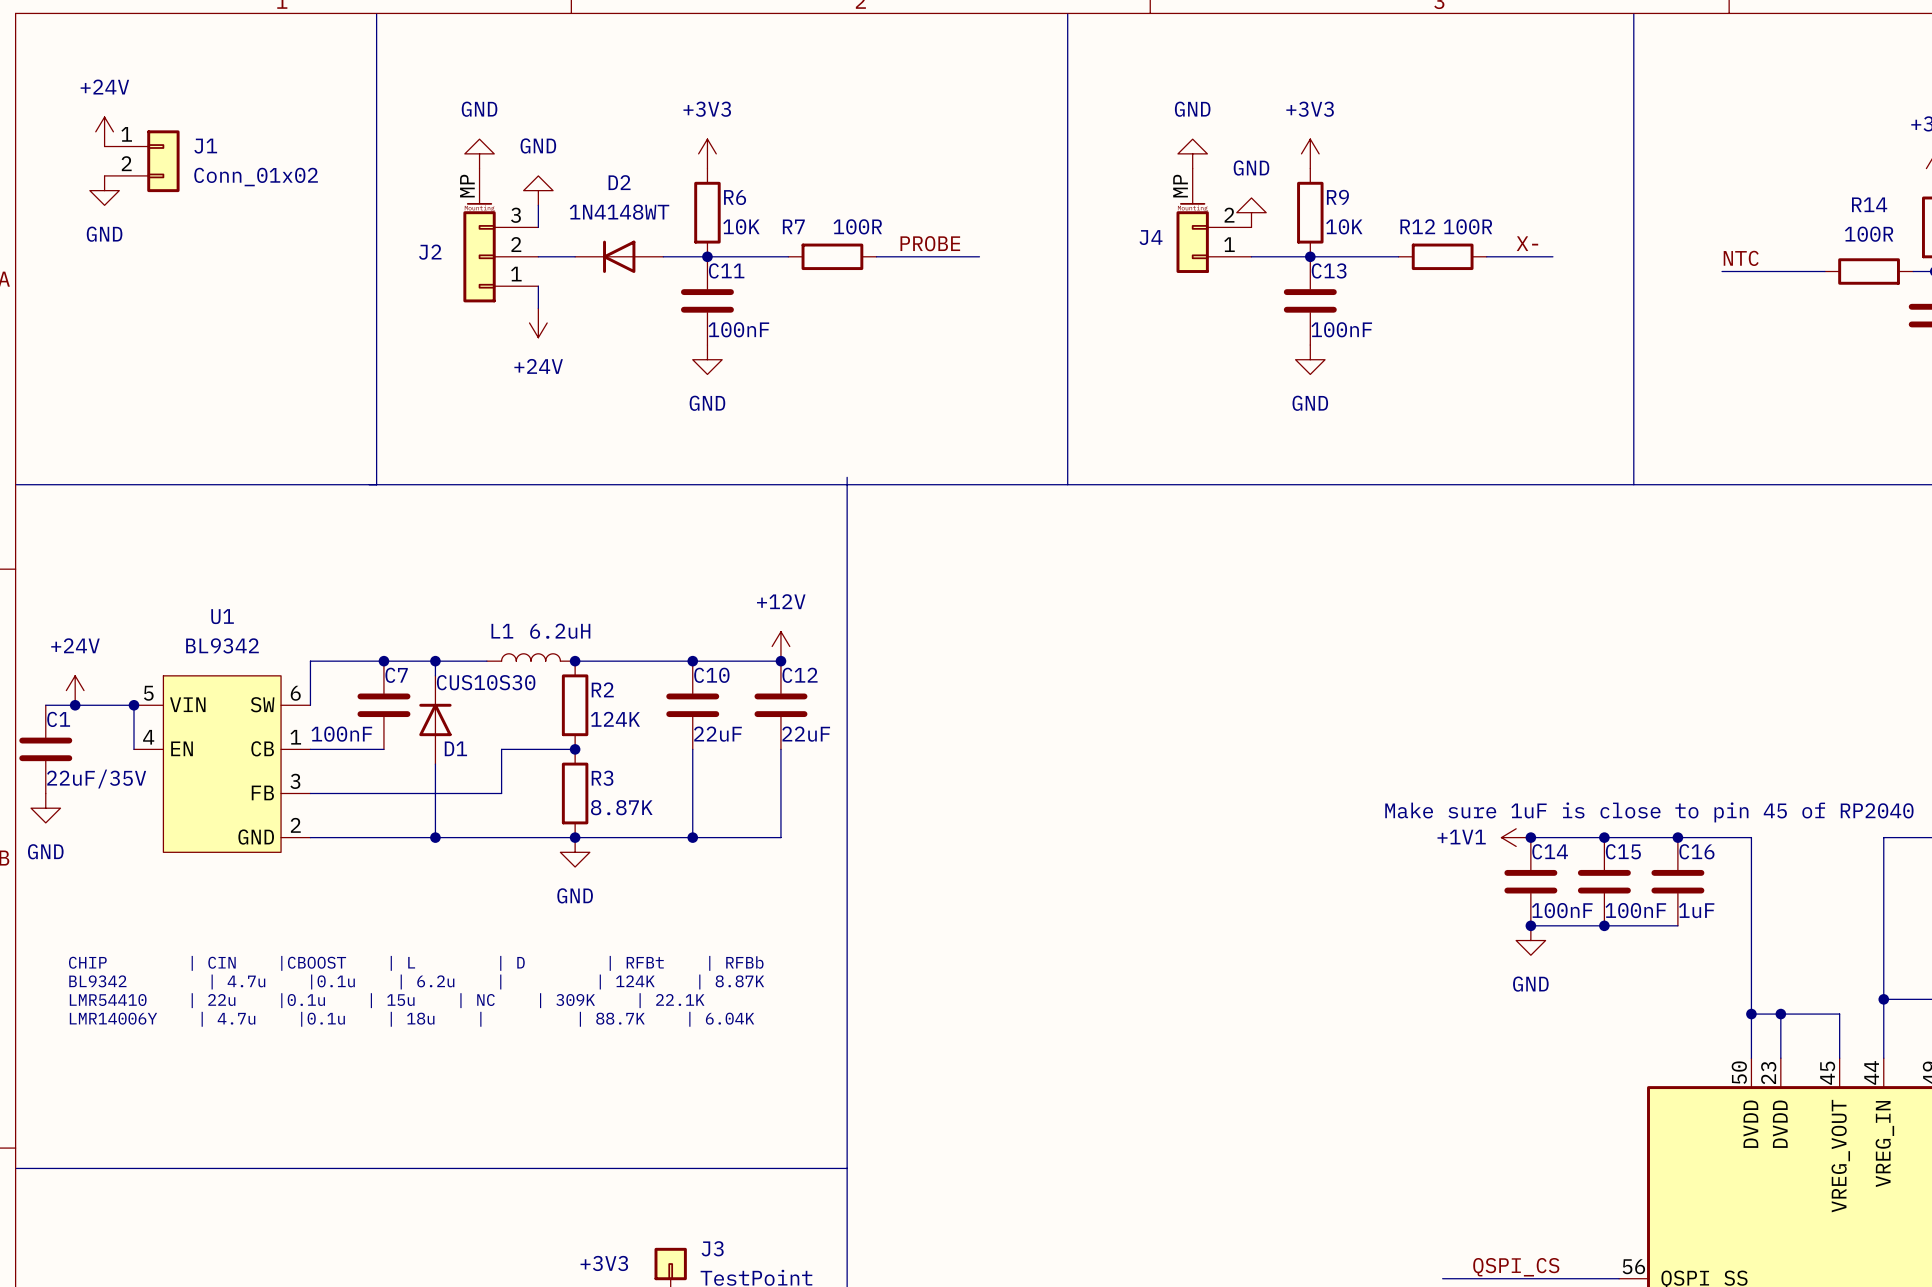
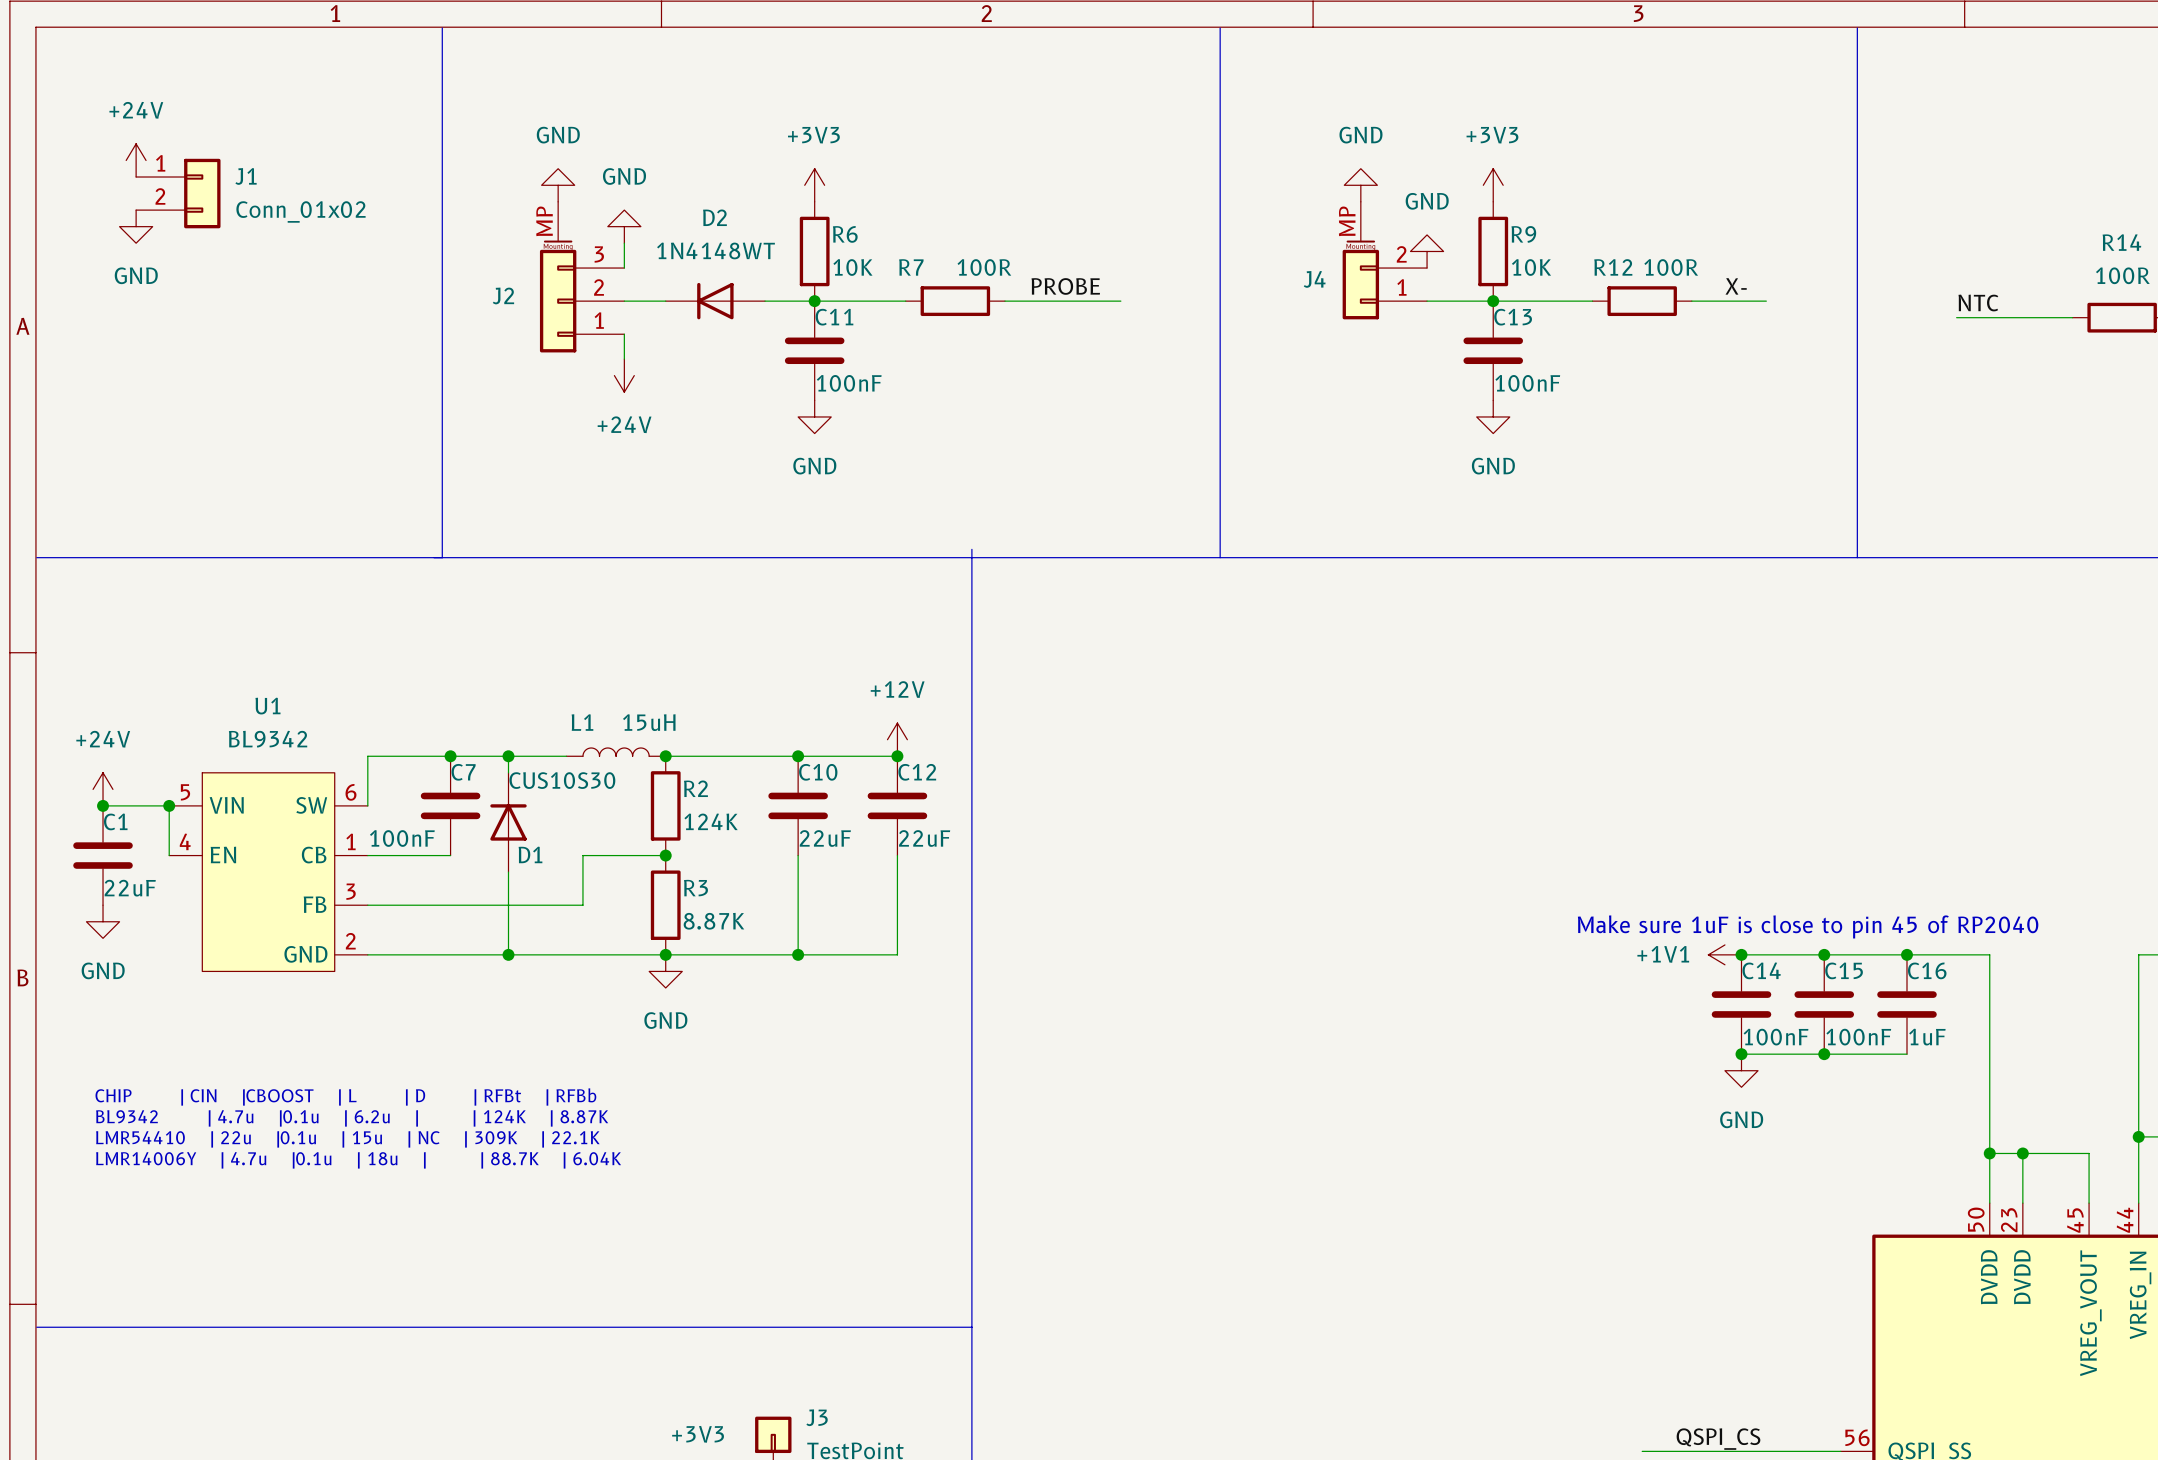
L1 value: 6.2uH (560, 631) -> 15uH (649, 722)
wire: (45, 705) (75, 705) -> none
C1 position: (45, 749) -> (103, 855)
C1 value: 22uF/35V (96, 779) -> 22uF (130, 888)
power symbol position: GND (45, 808) -> GND (103, 921)

